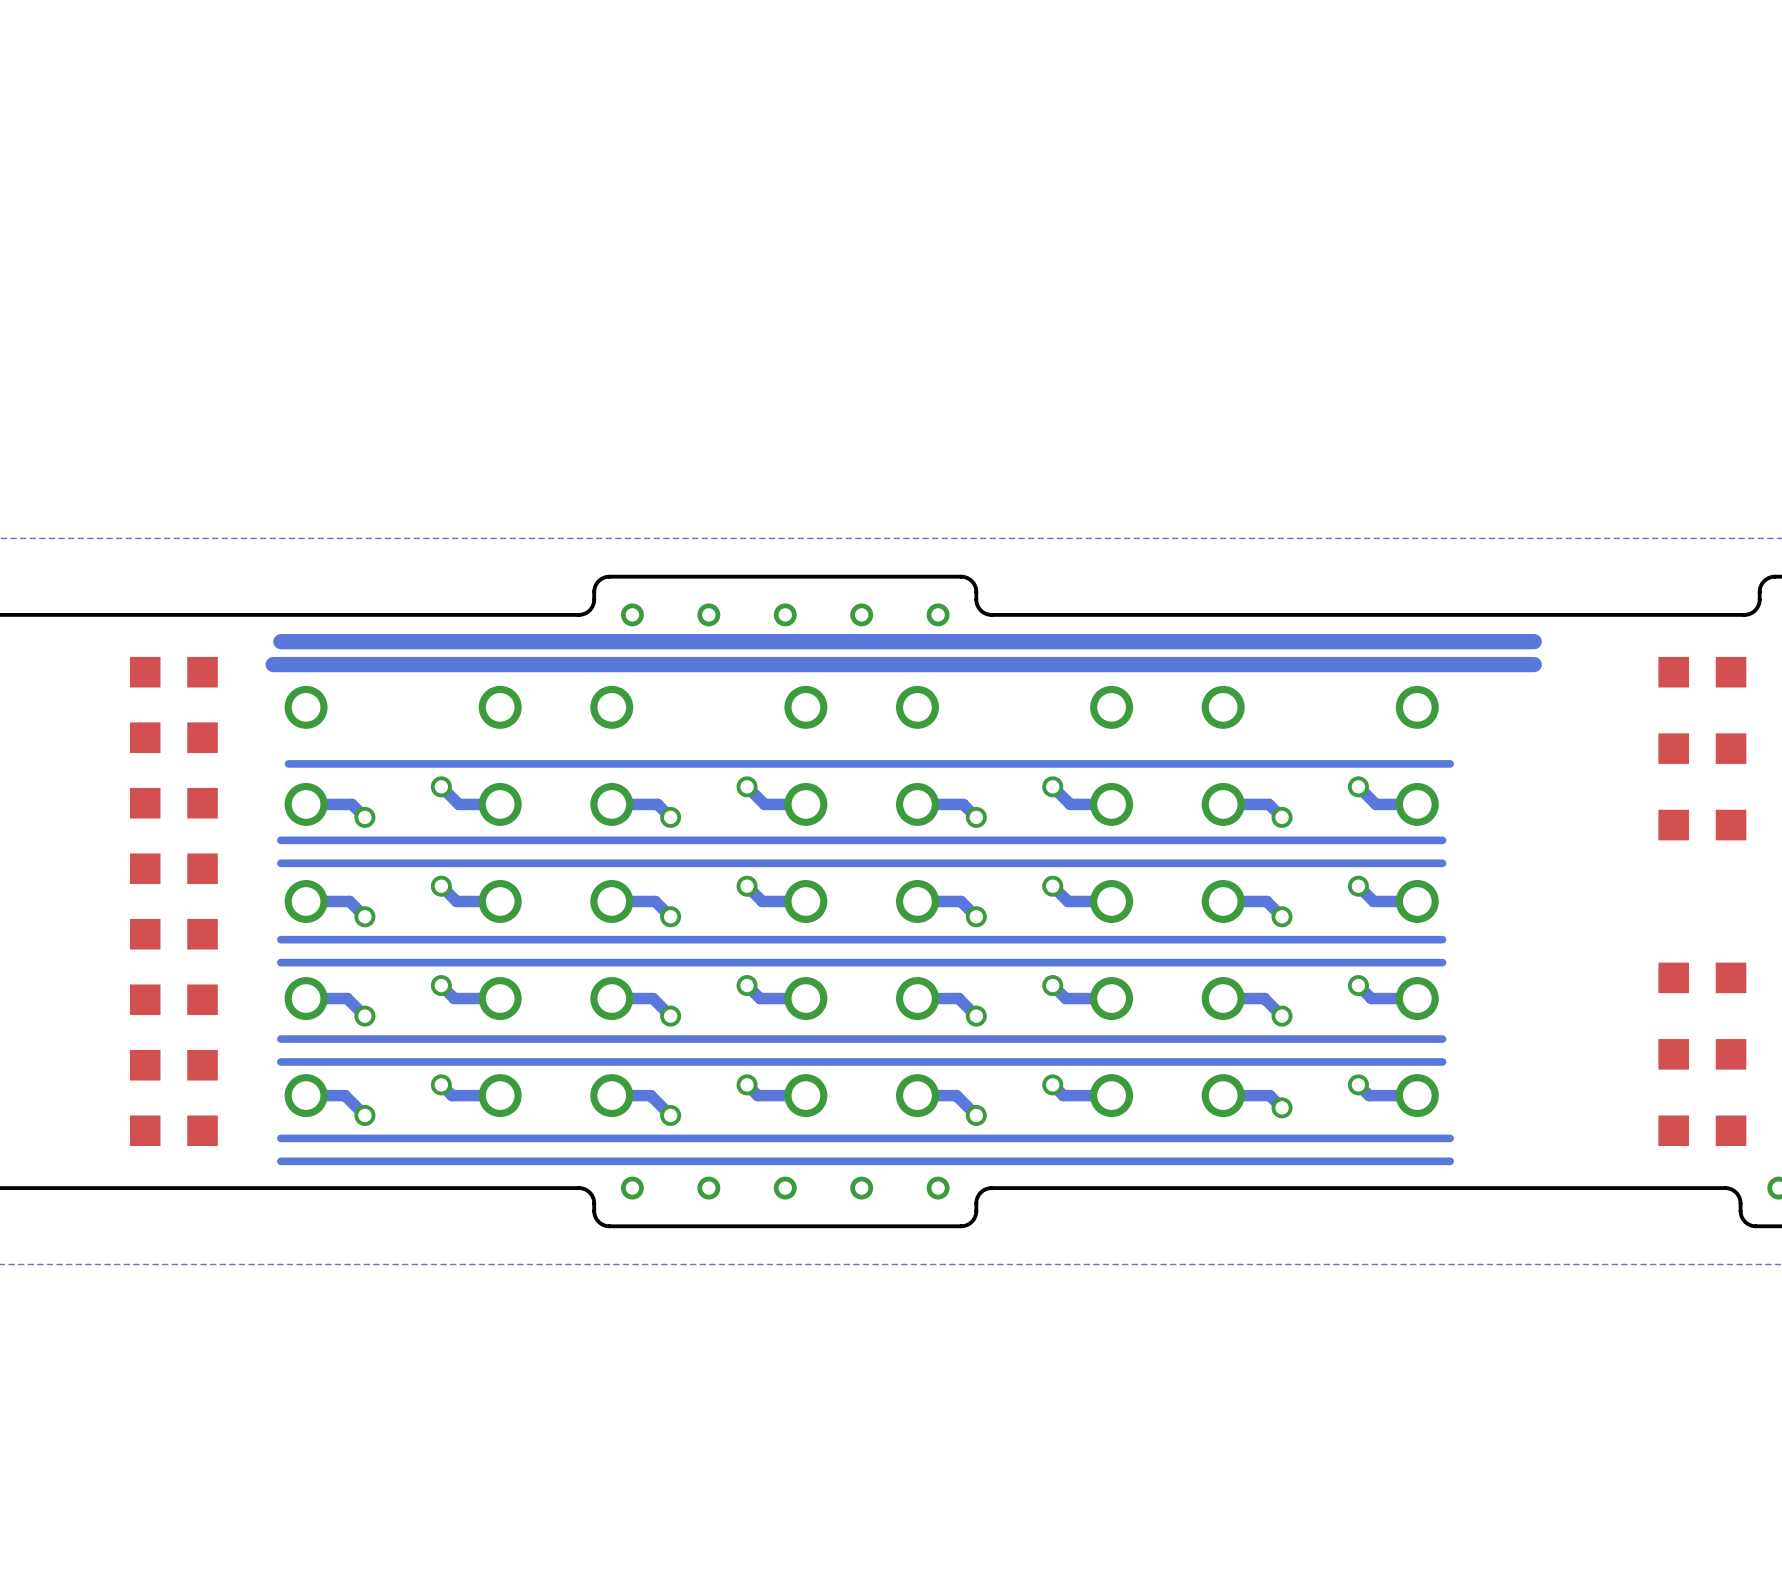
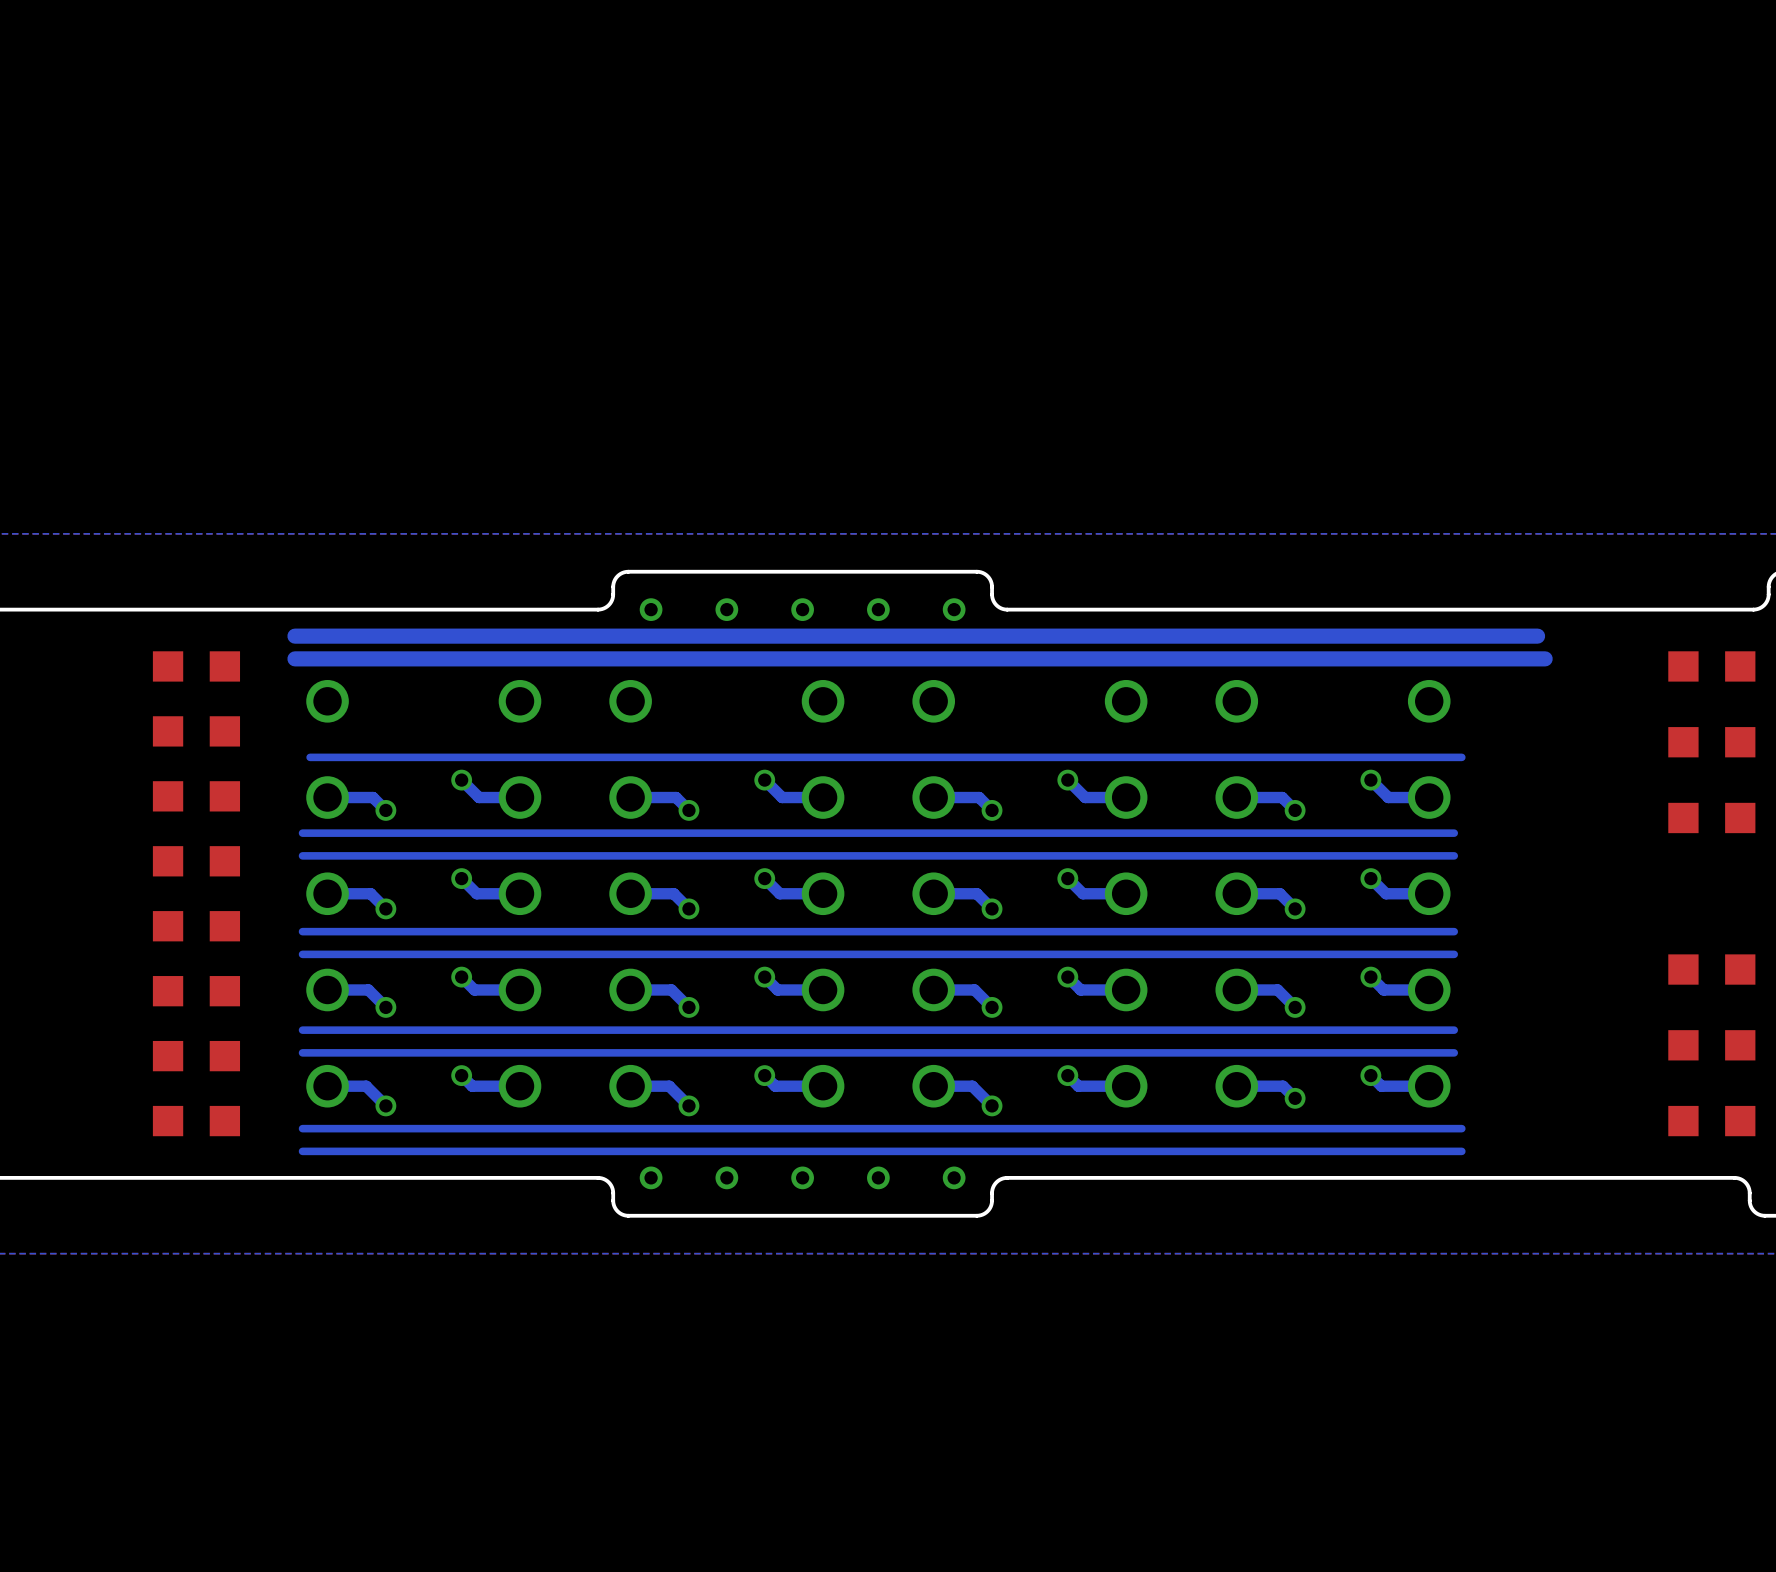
bottom track: none -> (302, 636) (294, 636)
bottom track: (1534, 641) (1526, 641) -> none

